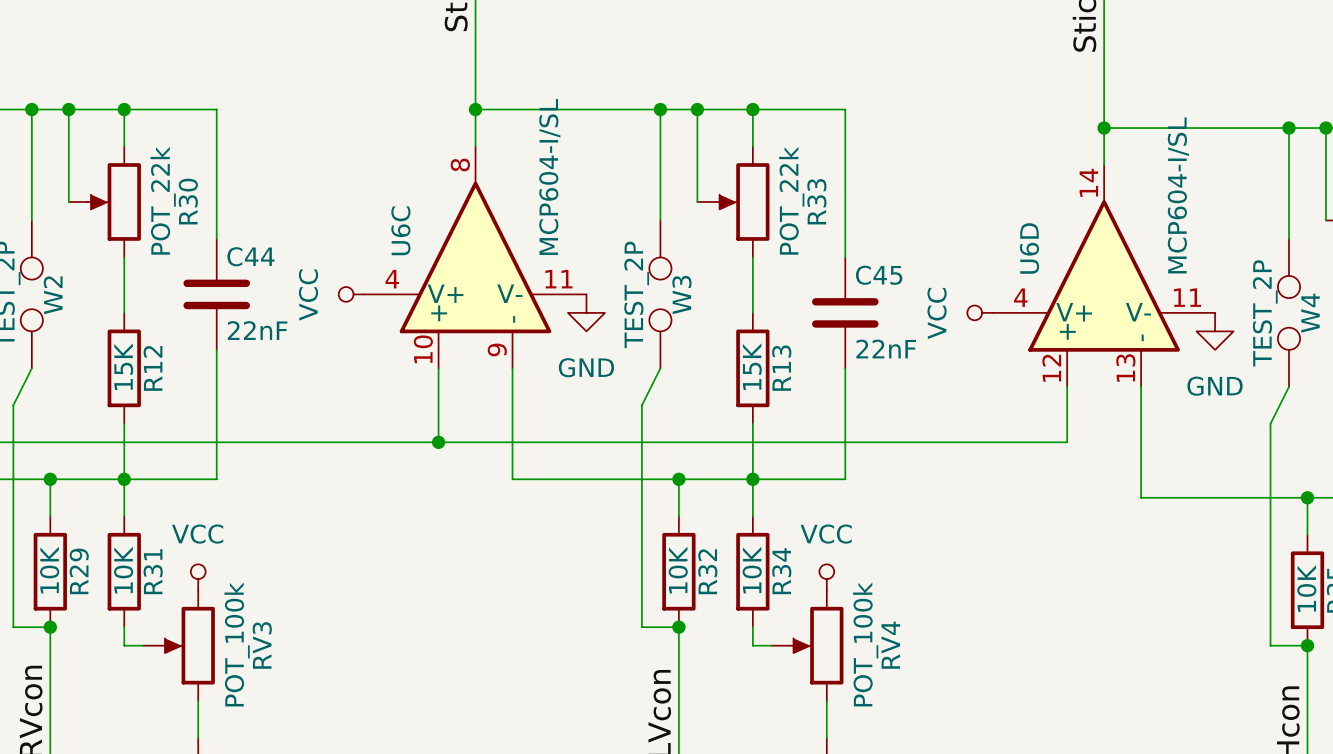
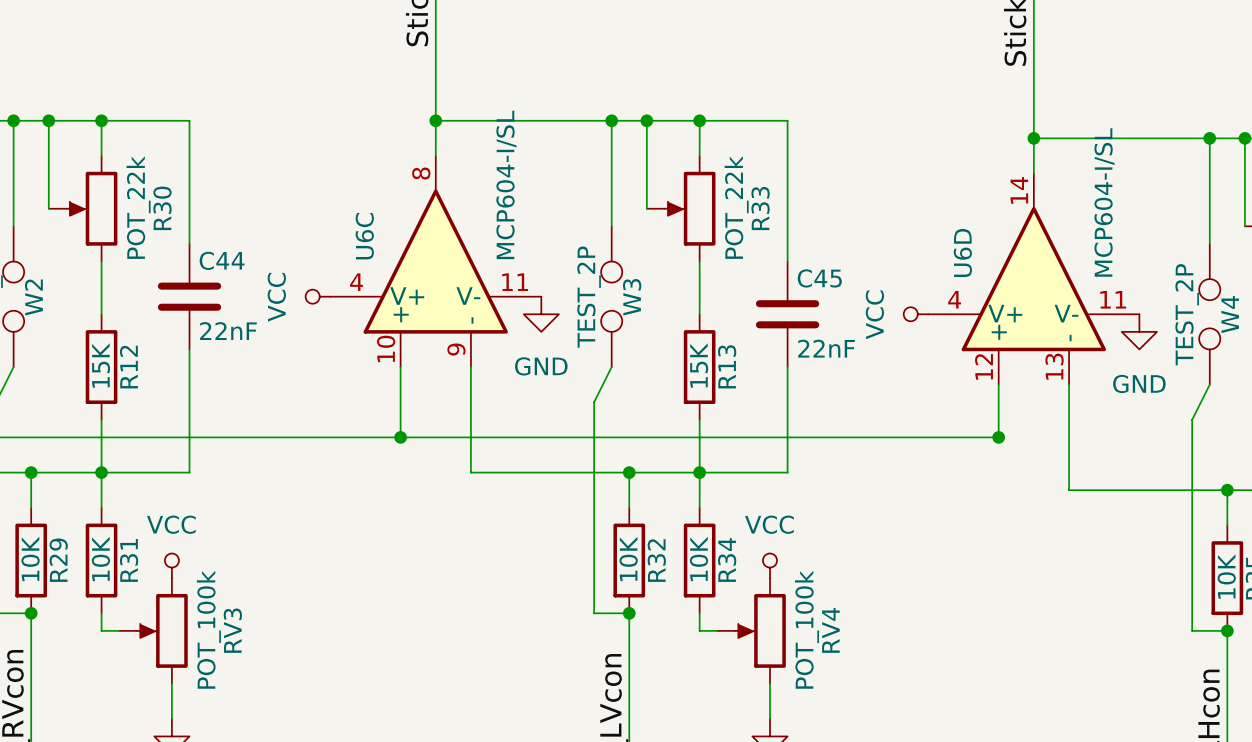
junction: none -> (998, 437)

